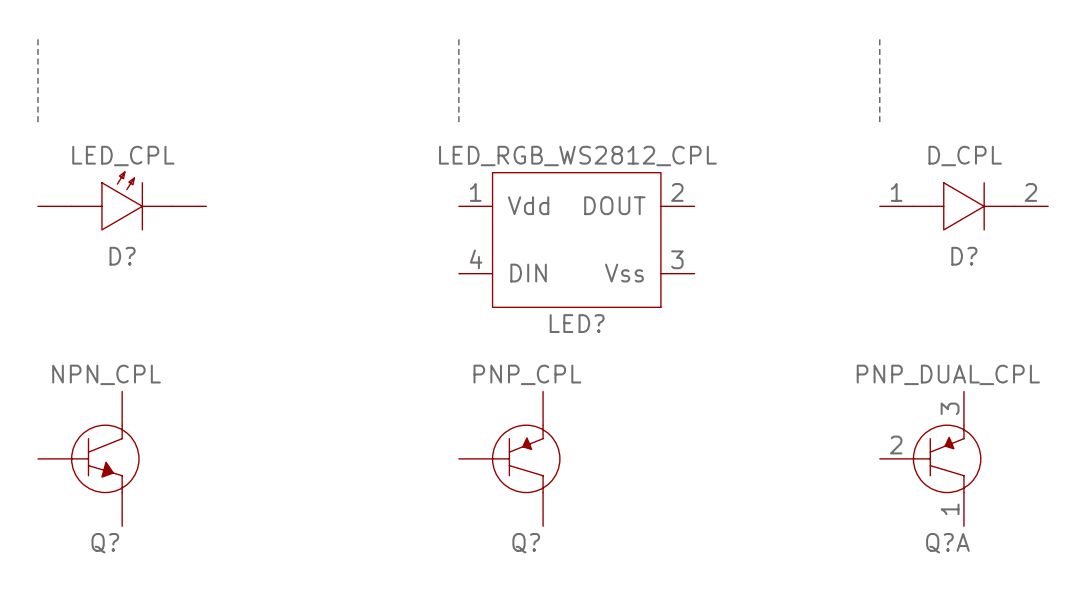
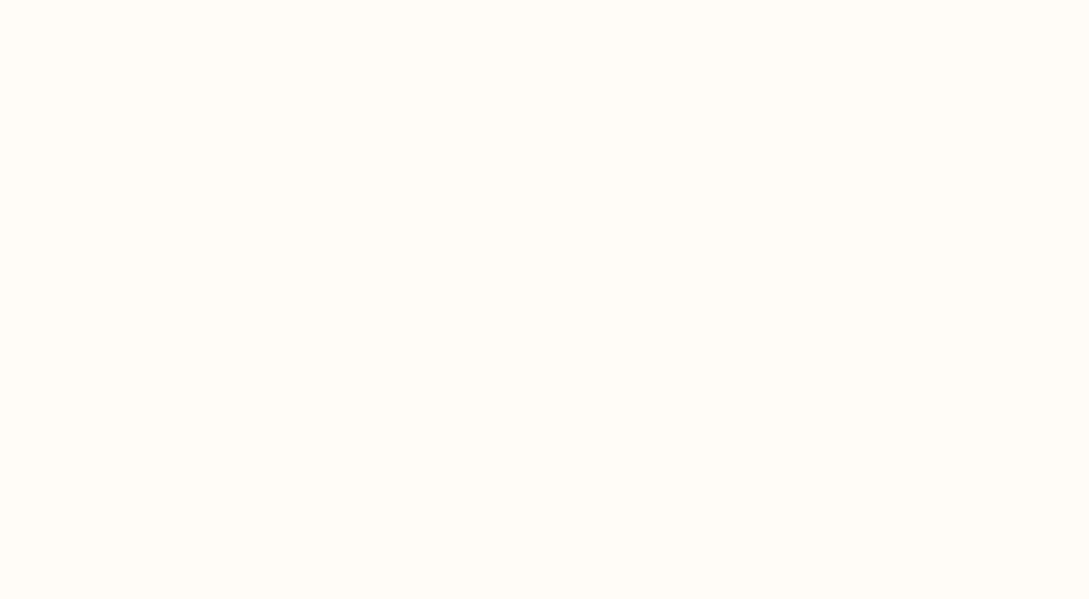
line: (37, 37) (37, 122) -> none
line: (458, 37) (458, 122) -> none
line: (879, 37) (879, 122) -> none
D?: LED_CPL (122, 200) -> none
D?: D_CPL (963, 206) -> none
LED?: LED_RGB_WS2812_CPL (576, 240) -> none
Q?: NPN_CPL (88, 458) -> none
Q?: PNP_CPL (509, 458) -> none
Q?A: PNP_DUAL_CPL (930, 458) -> none

